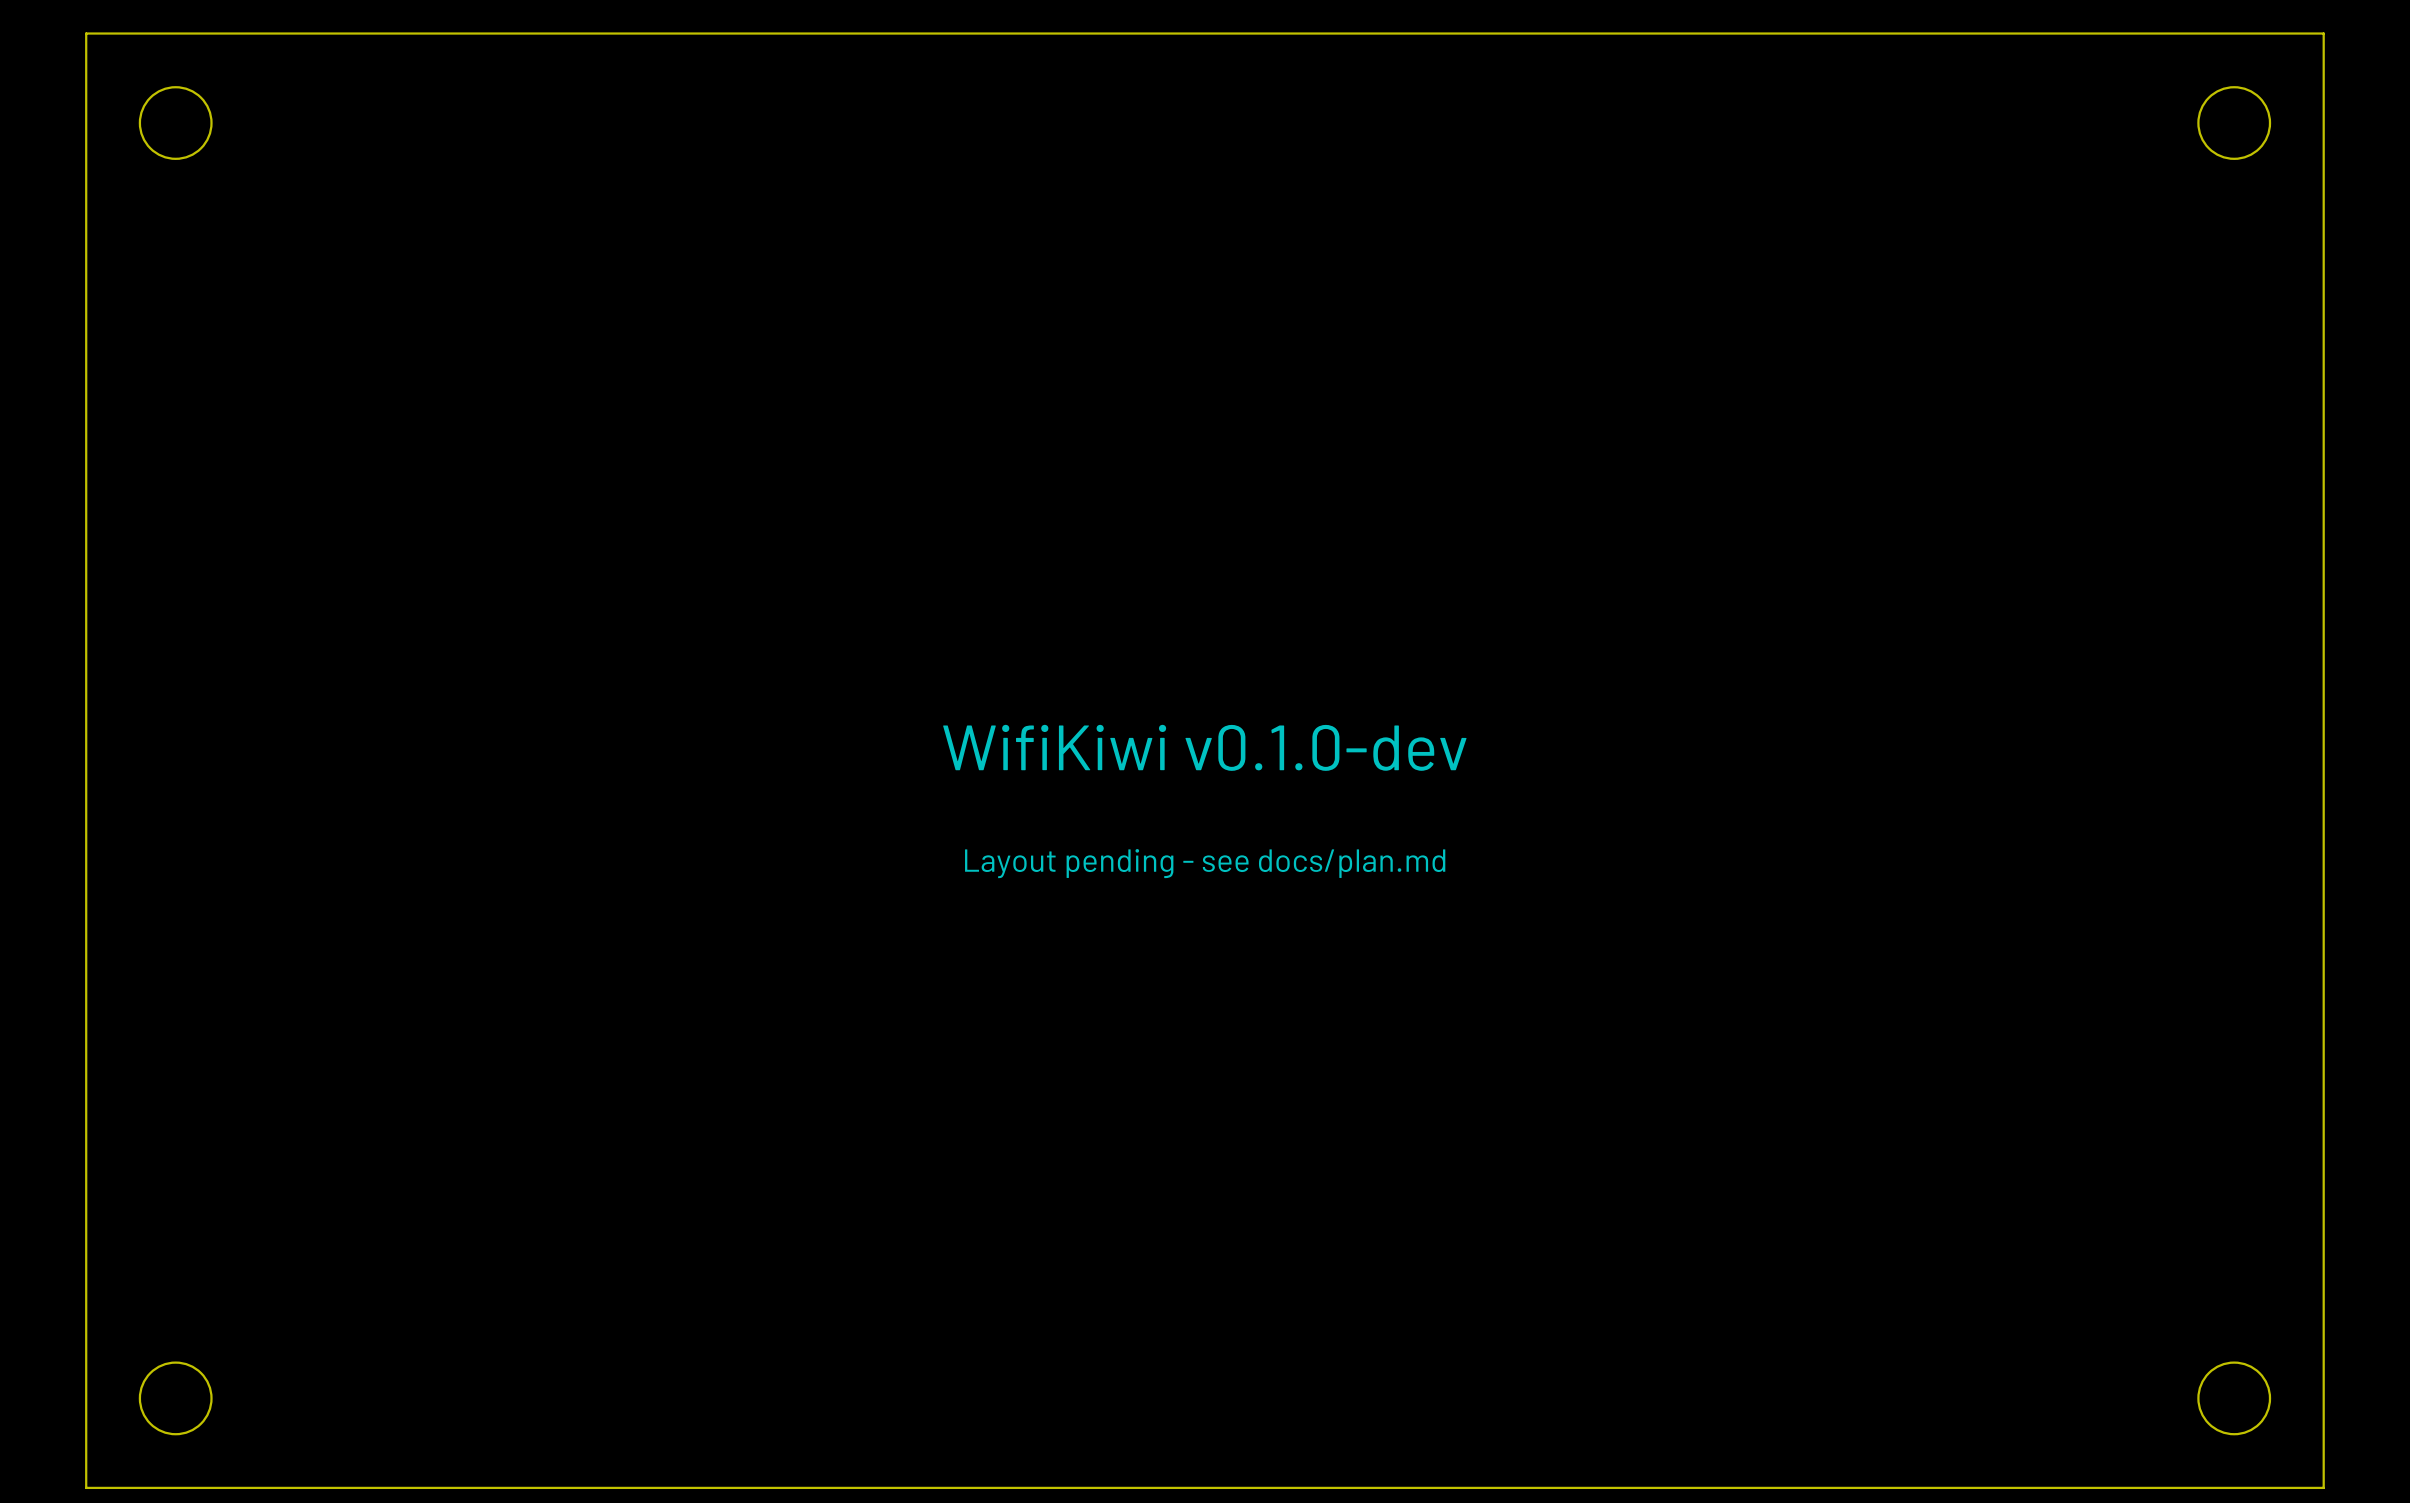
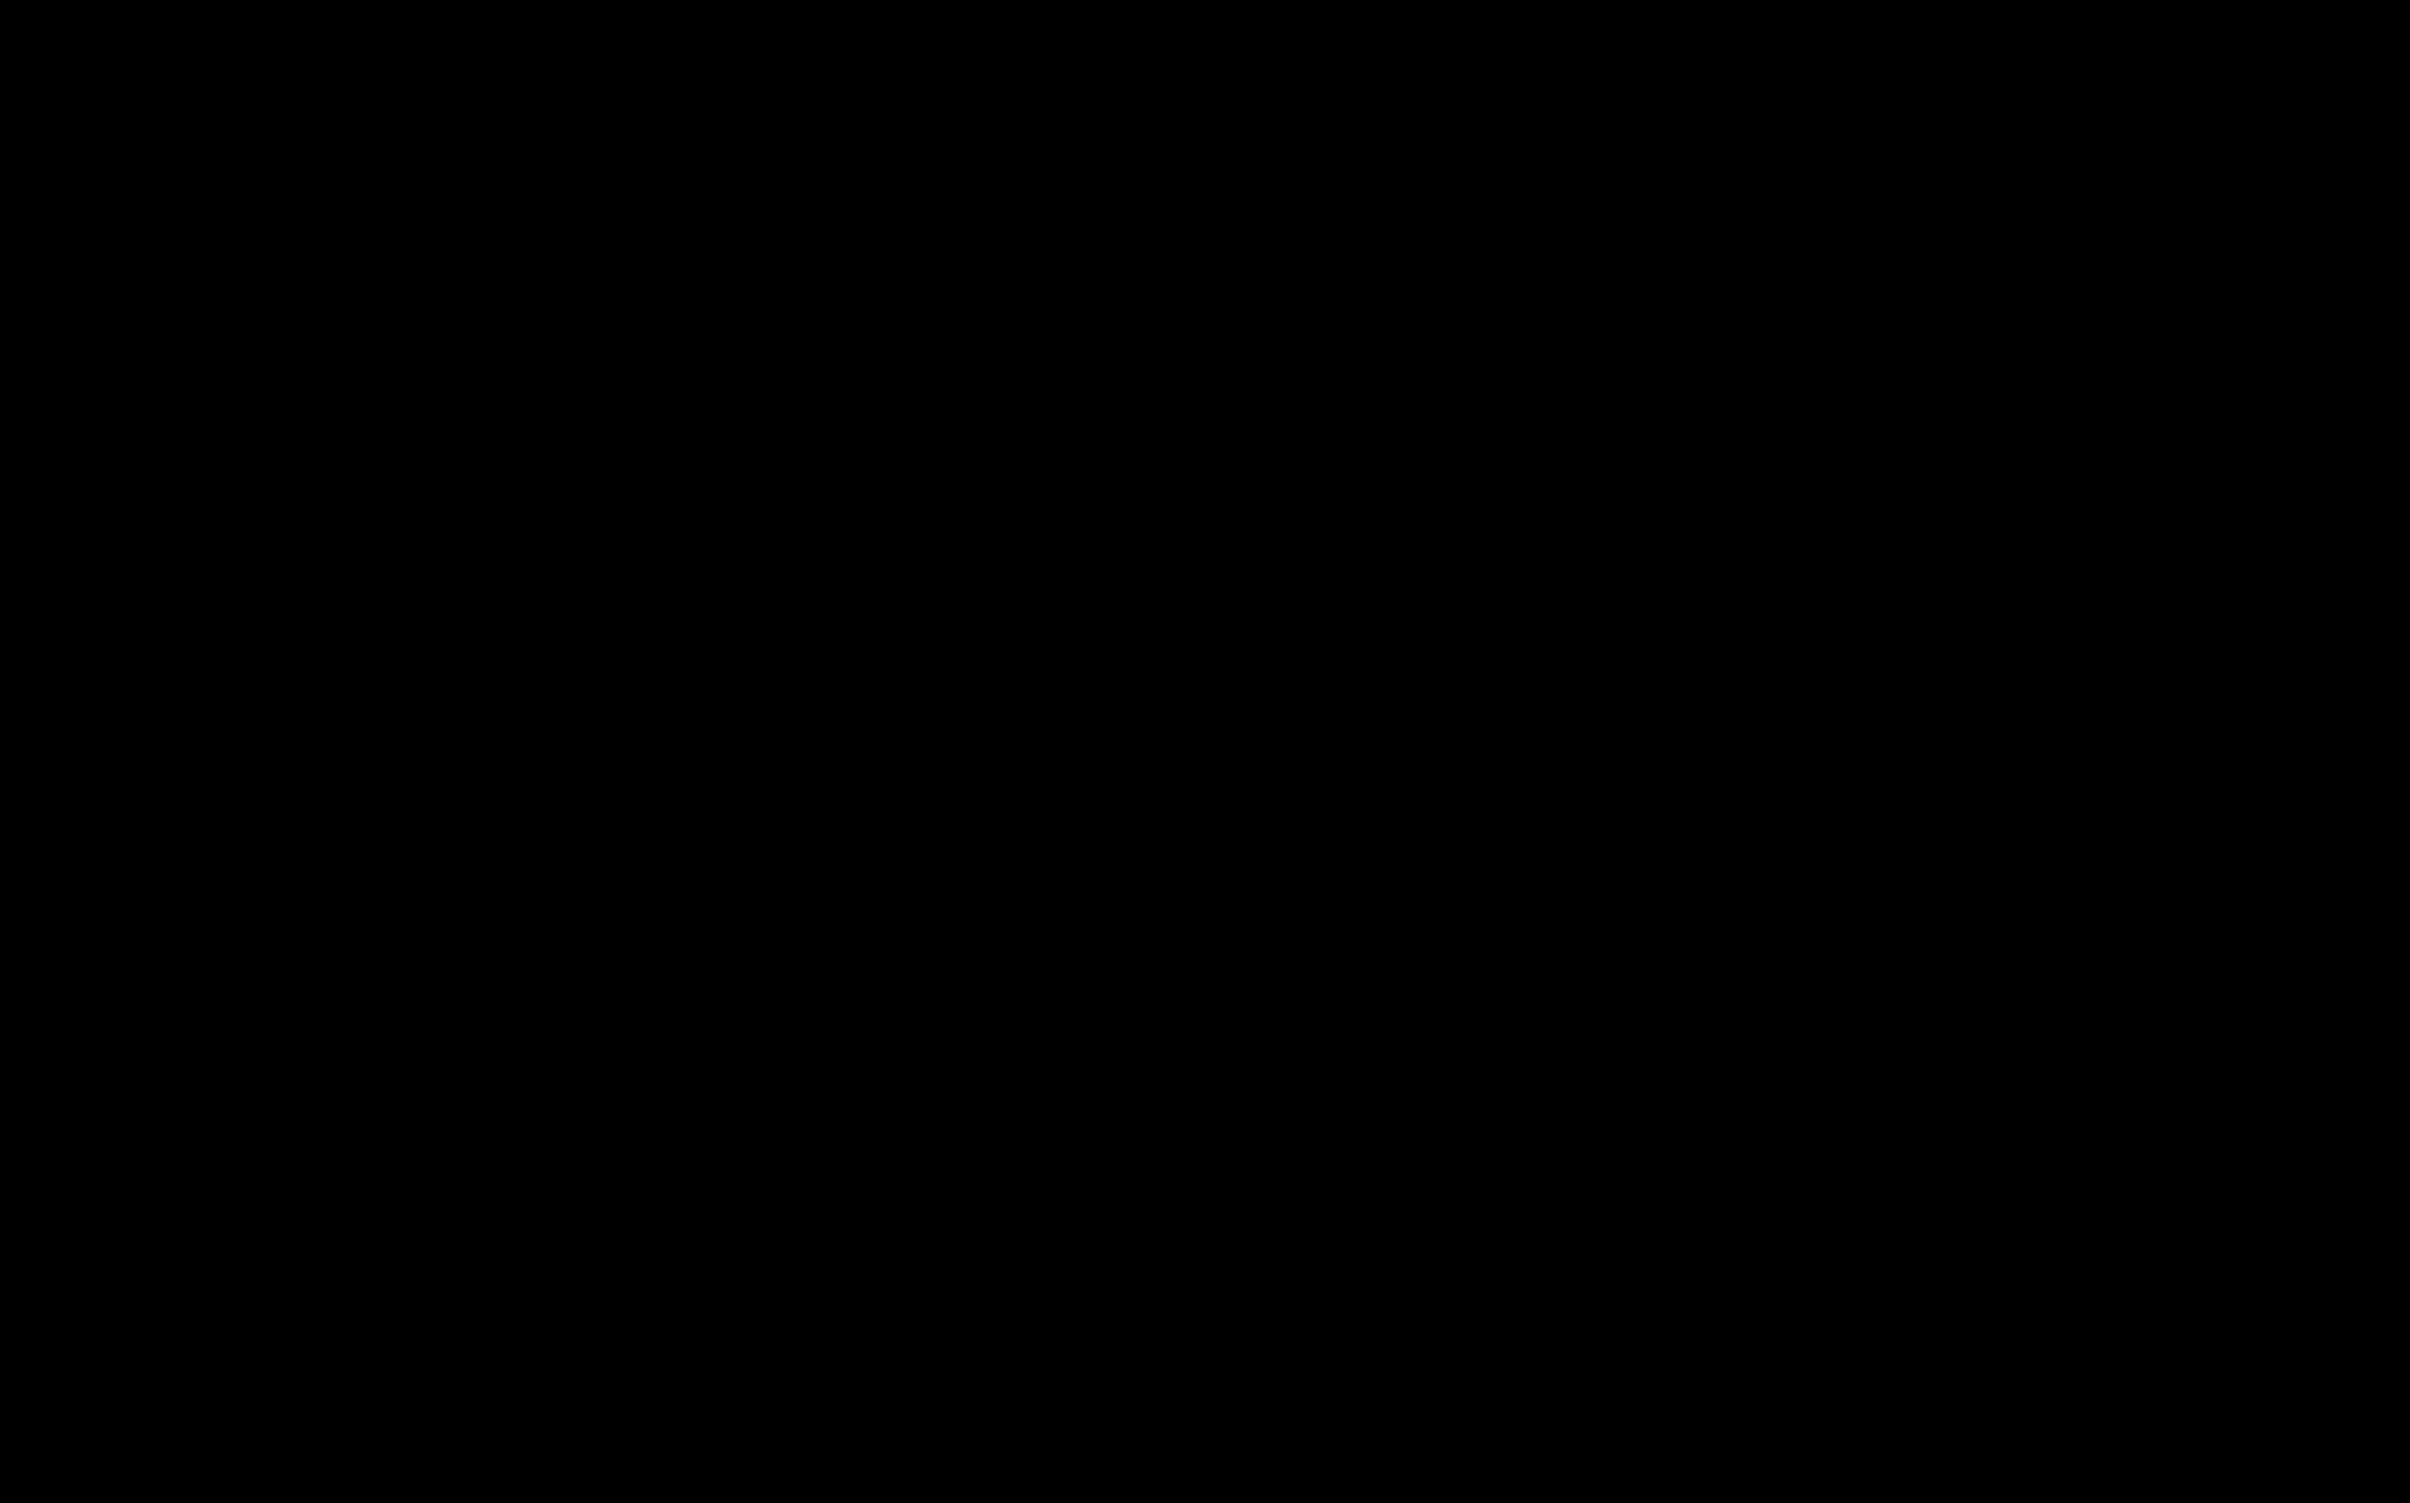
board edge: (86, 33) (2323, 33) (2323, 1487) (86, 1487) (86, 33) -> none
round board edge: [138, 86, 213, 160] -> none
round board edge: [2197, 86, 2272, 160] -> none
text: WifiKiwi v0.1.0-dev (1204, 747) -> none
text: Layout pending - see docs/plan.md (1205, 863) -> none
round board edge: [138, 1361, 213, 1436] -> none
round board edge: [2197, 1361, 2272, 1436] -> none

